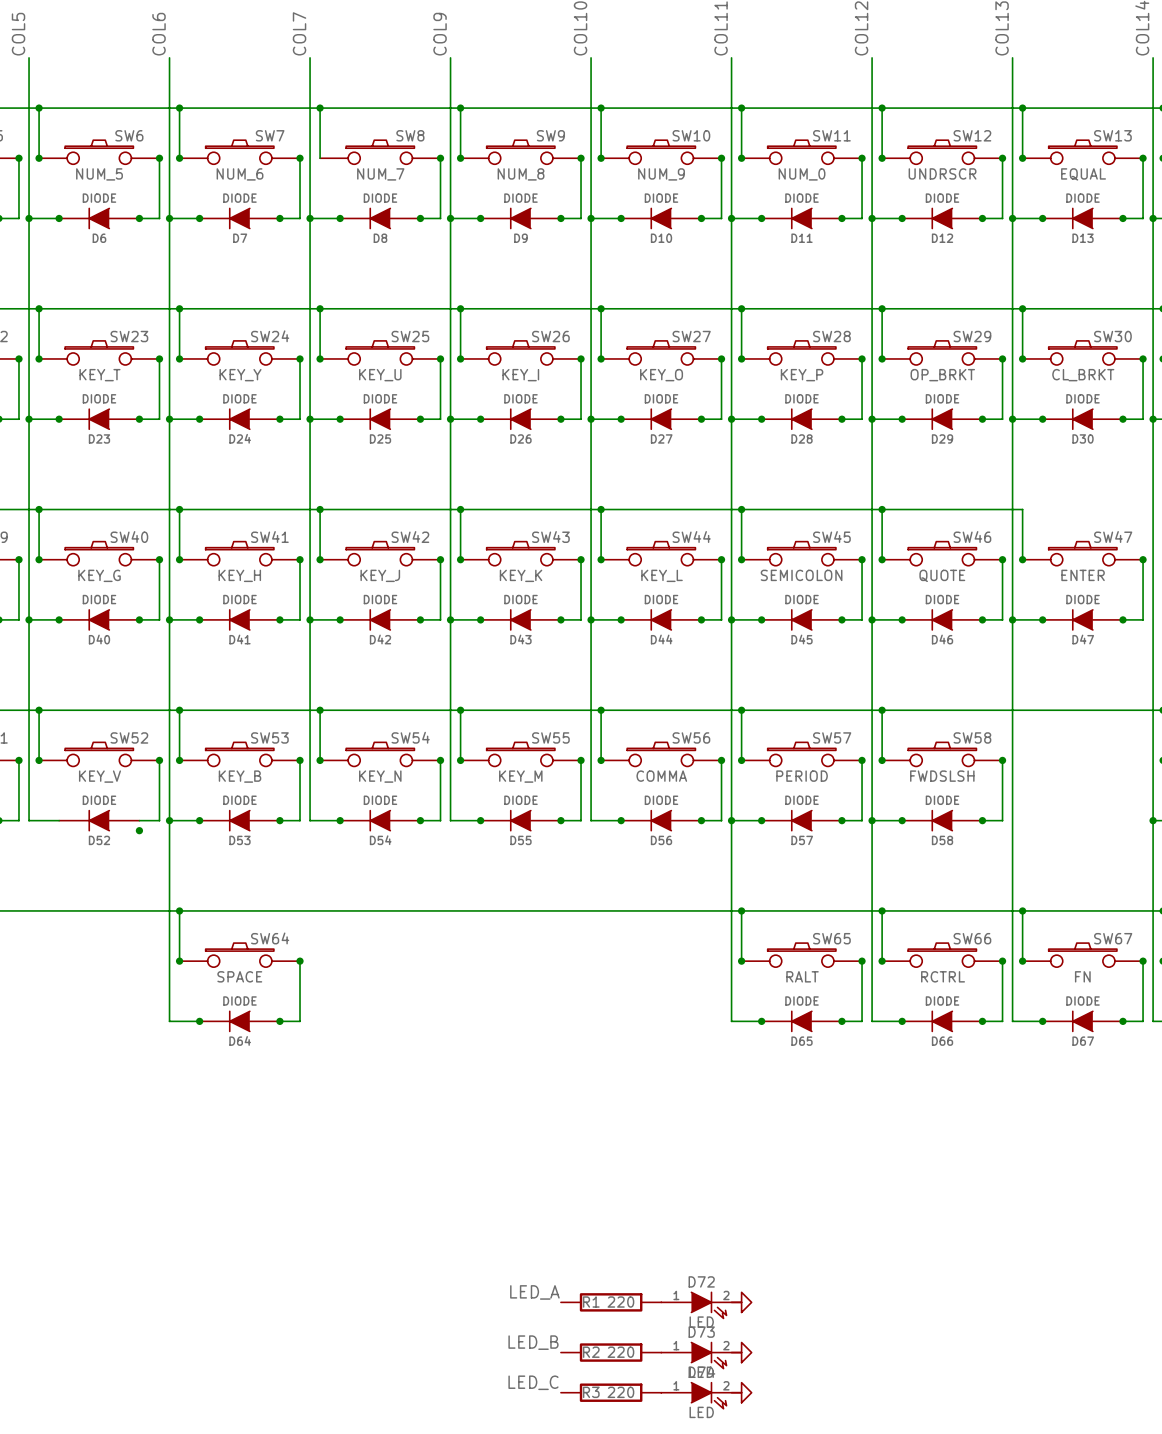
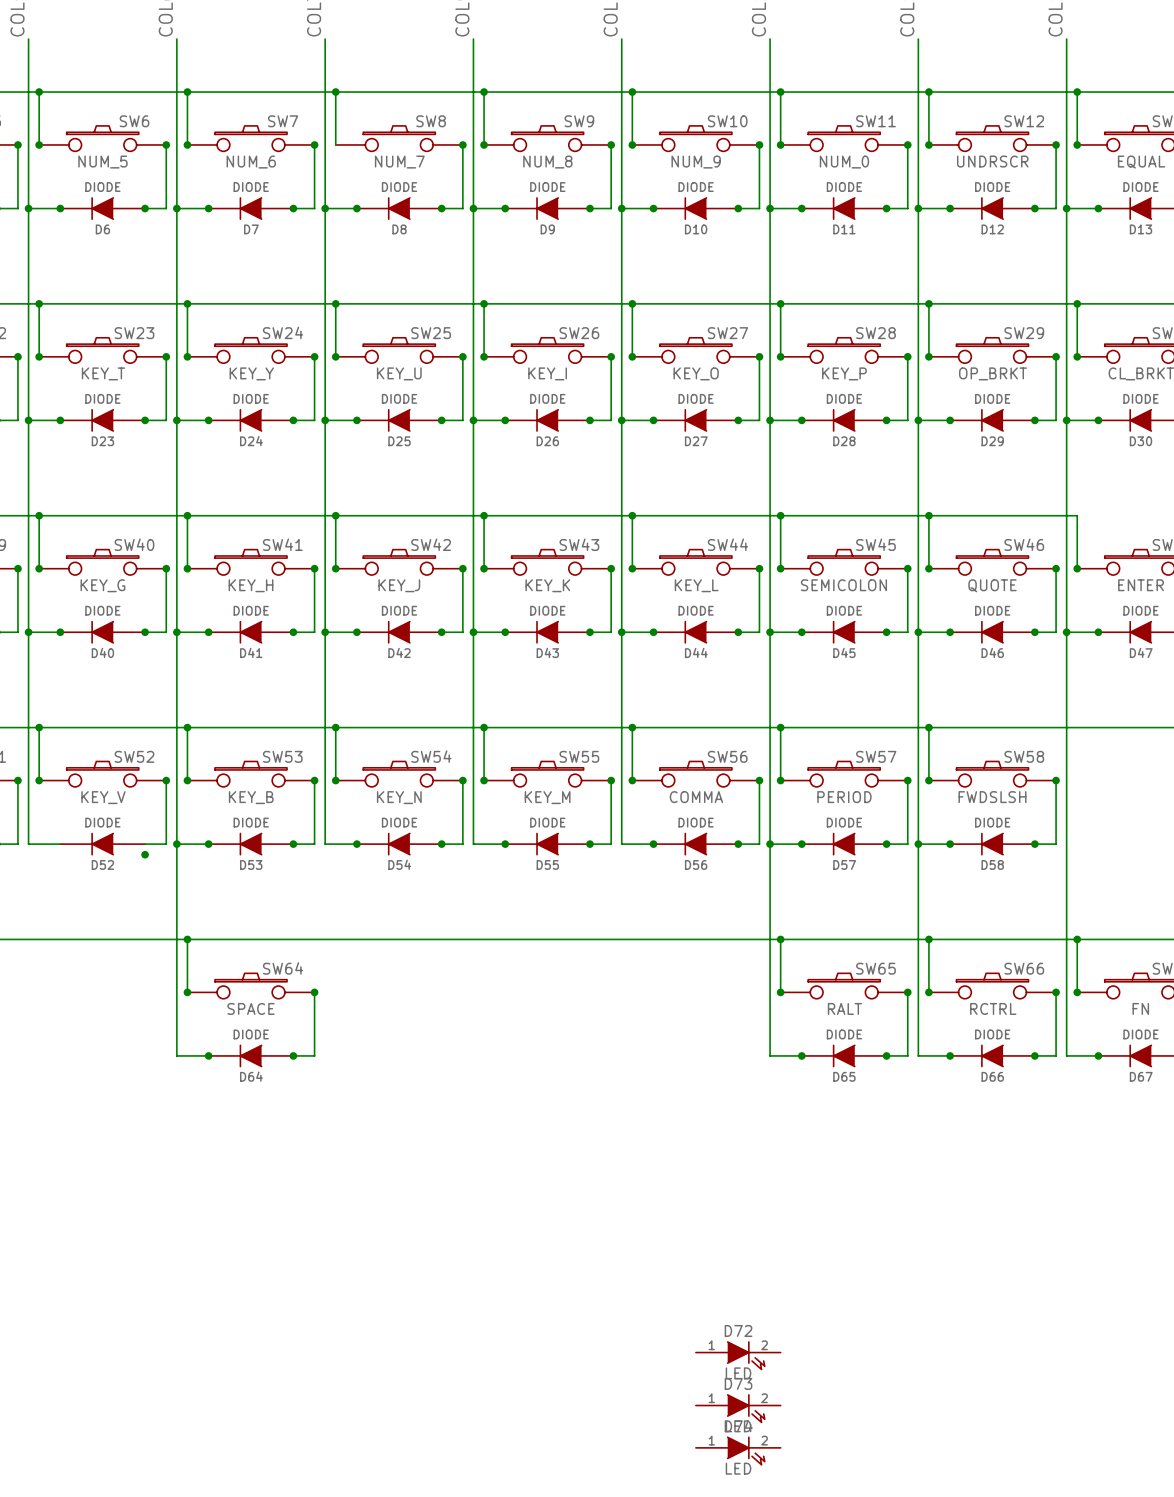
label: LED_A (534, 1292) -> none
R1: 220 (611, 1302) -> none
power symbol: (741, 1302) -> none
label: LED_B (533, 1342) -> none
R2: 220 (611, 1352) -> none
power symbol: (741, 1352) -> none
label: LED_C (533, 1382) -> none
R3: 220 (611, 1392) -> none
power symbol: (741, 1392) -> none

